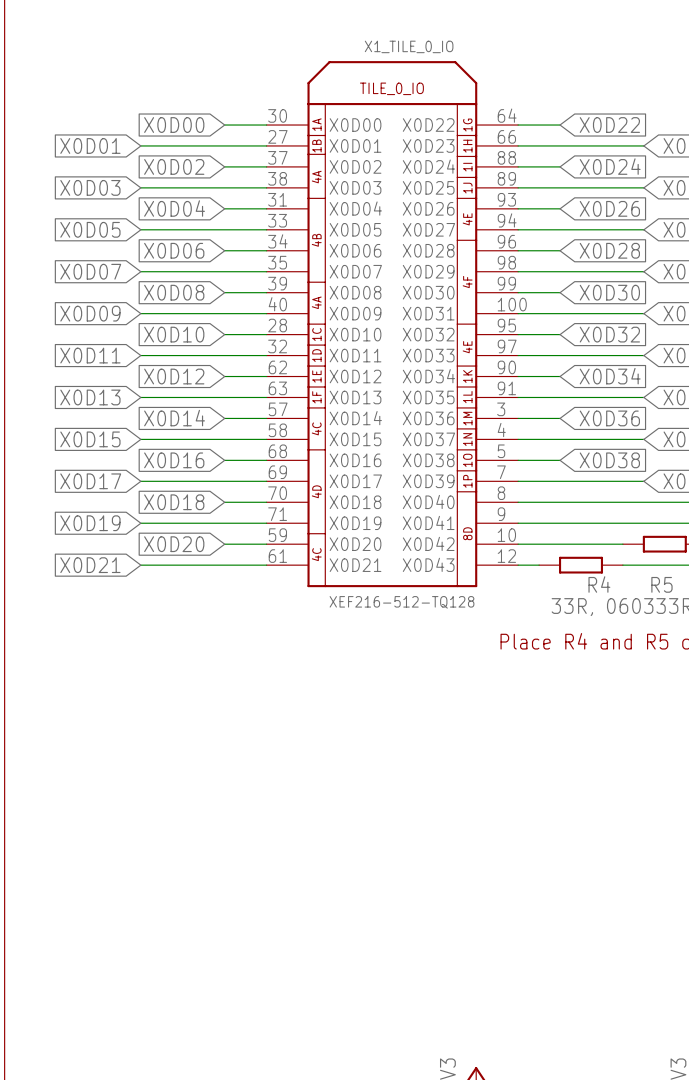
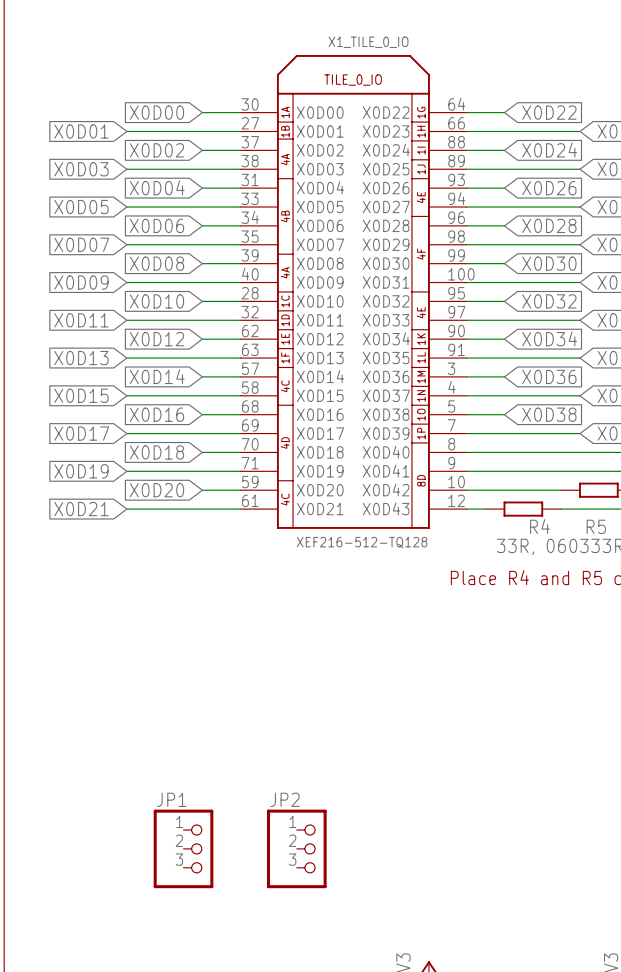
JP1: none -> (183, 848)
JP2: none -> (296, 848)

